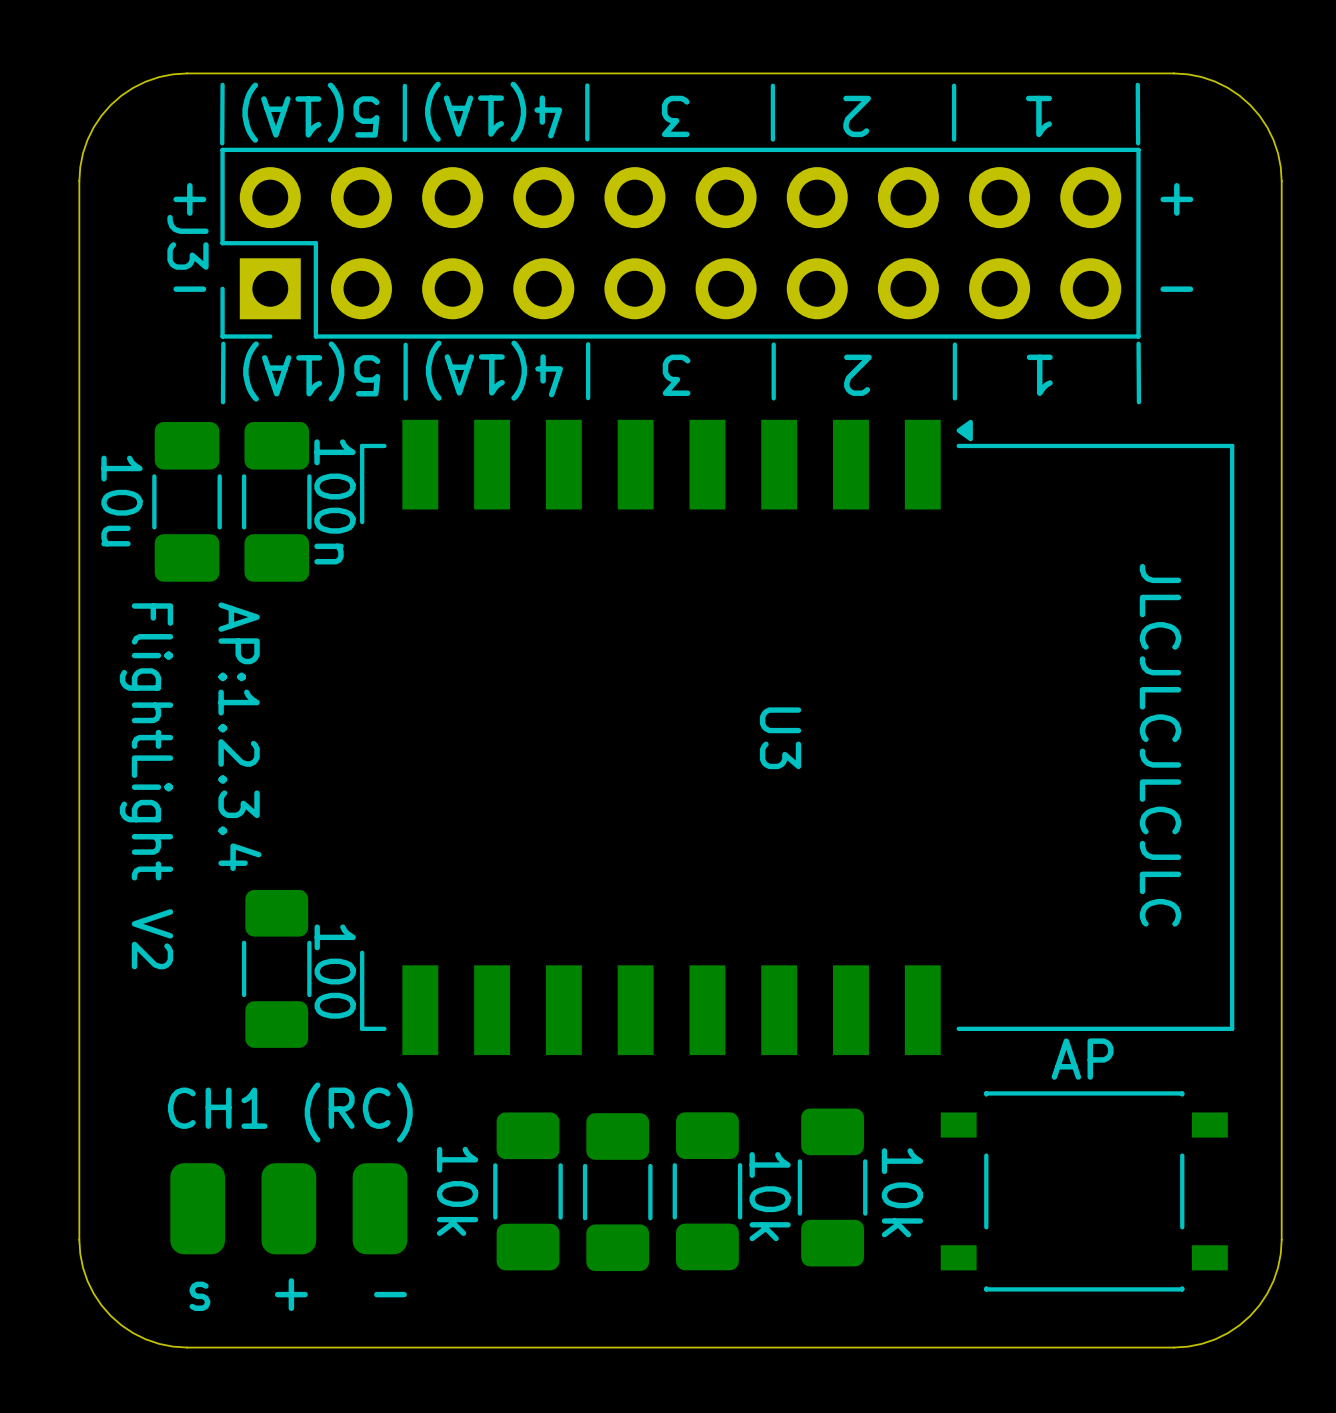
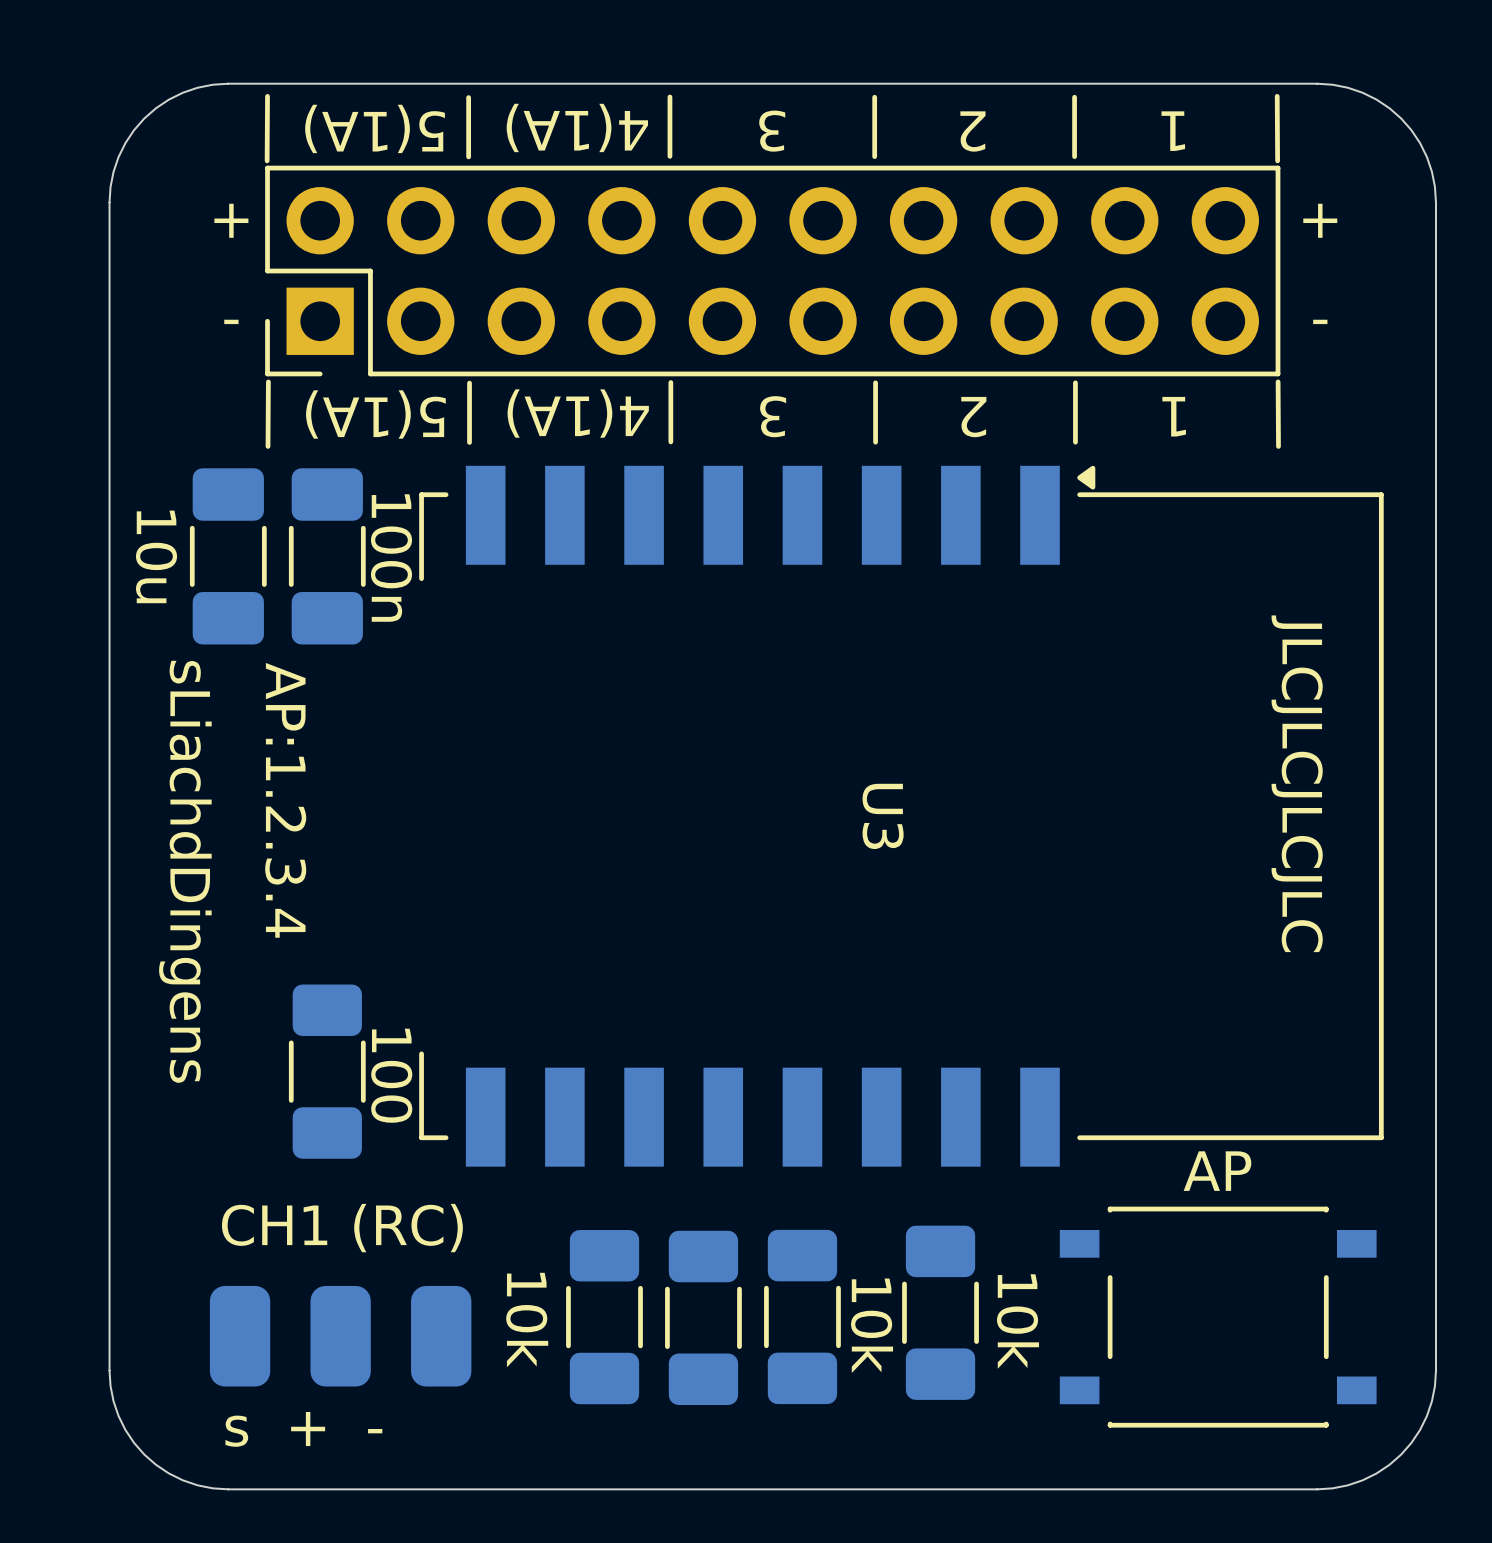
J3 name: J3 (188, 242) -> none
text: FlightLight V2 (146, 786) -> sLiachdDingens (185, 871)

